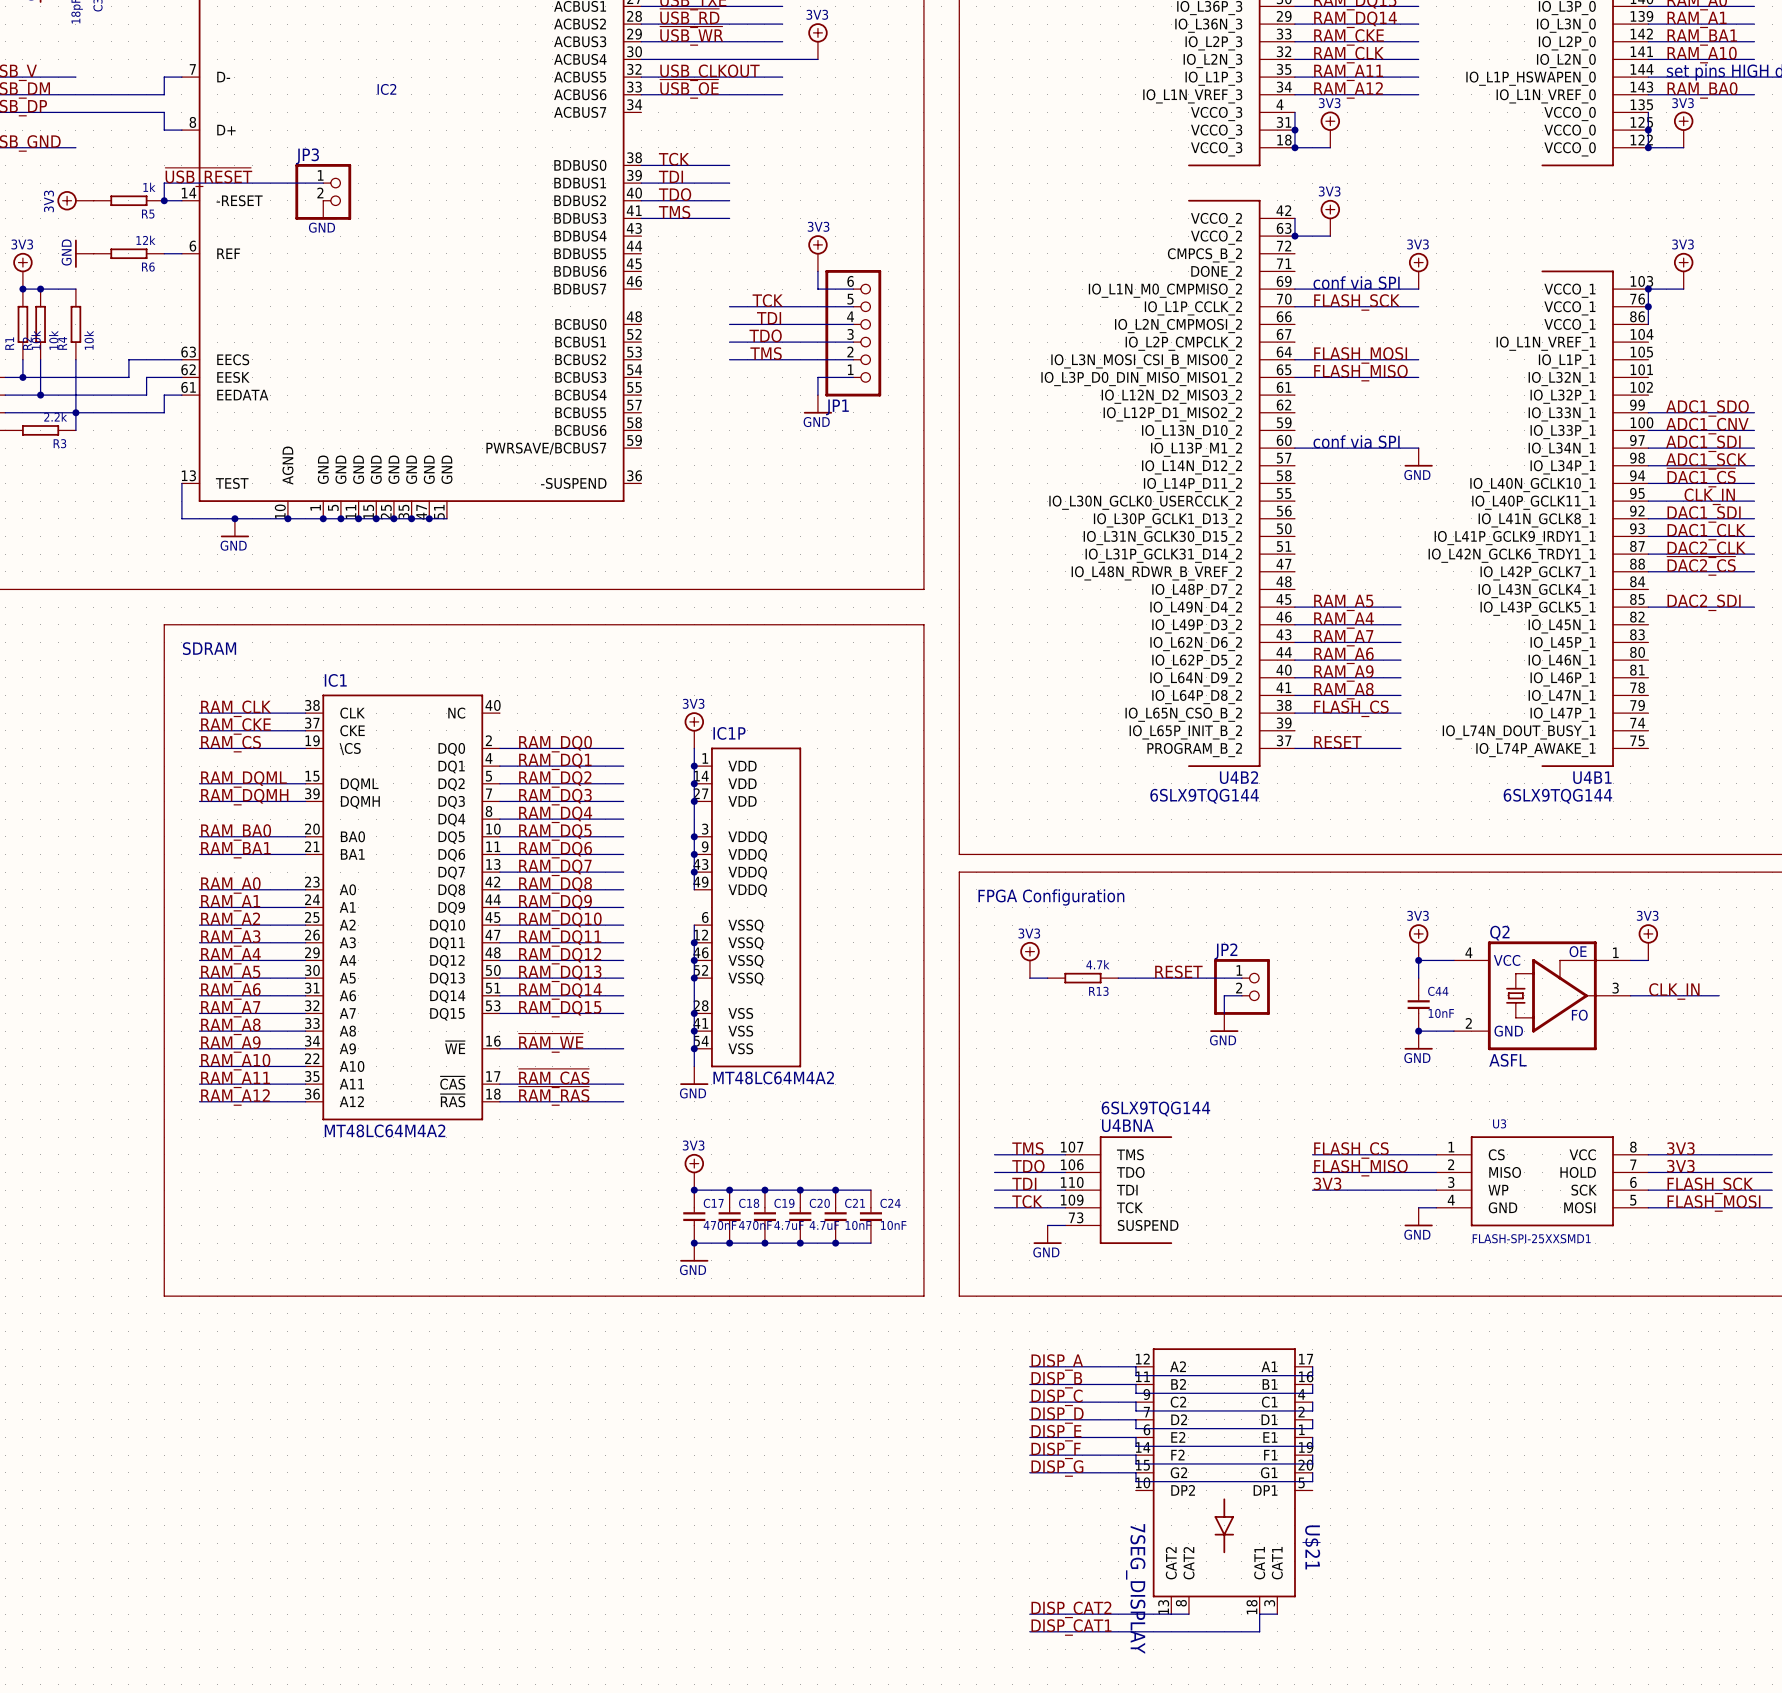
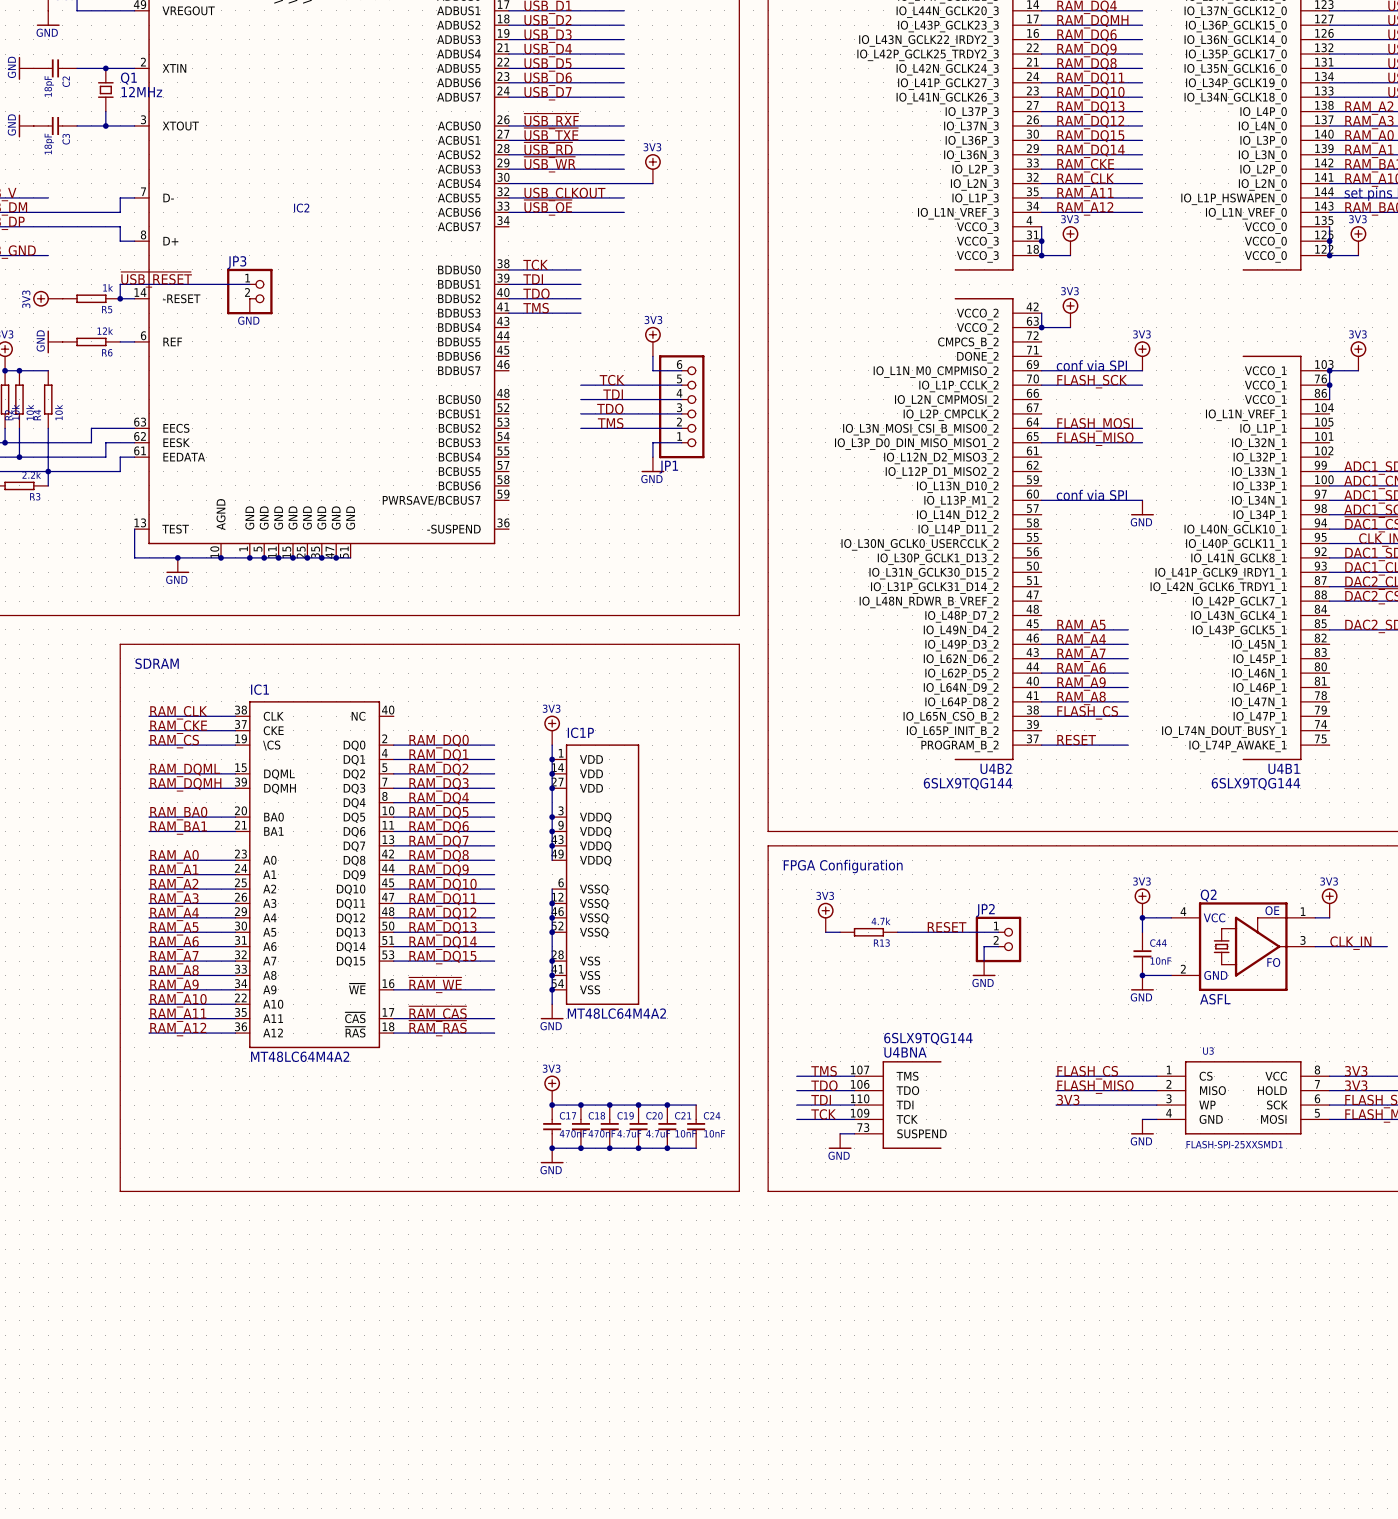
label: DISP_A (1057, 1362) -> none
wire: (1029, 1366) (1135, 1366) (1135, 1375) (1312, 1375) (1312, 1366) -> none
label: DISP_B (1056, 1380) -> none
wire: (1029, 1384) (1135, 1384) (1135, 1393) (1312, 1393) (1312, 1384) -> none
label: DISP_C (1057, 1397) -> none
wire: (1029, 1402) (1135, 1402) (1135, 1410) (1312, 1410) (1312, 1402) -> none
label: DISP_D (1057, 1415) -> none
wire: (1029, 1419) (1135, 1419) (1135, 1428) (1312, 1428) (1312, 1419) -> none
label: DISP_E (1056, 1433) -> none
wire: (1029, 1437) (1135, 1437) (1135, 1446) (1312, 1446) (1312, 1437) -> none
label: DISP_F (1056, 1450) -> none
wire: (1029, 1455) (1135, 1455) (1135, 1463) (1312, 1463) (1312, 1455) -> none
label: DISP_G (1057, 1468) -> none
wire: (1029, 1472) (1135, 1472) (1135, 1481) (1312, 1481) (1312, 1472) -> none
U$21: 7SEG_DISPLAY (1224, 1481) -> none
label: DISP_CAT2 (1071, 1609) -> none
wire: (1029, 1614) (1188, 1614) -> none
wire: (1277, 1614) (1259, 1614) (1259, 1631) (1029, 1631) -> none
label: DISP_CAT1 (1071, 1627) -> none

